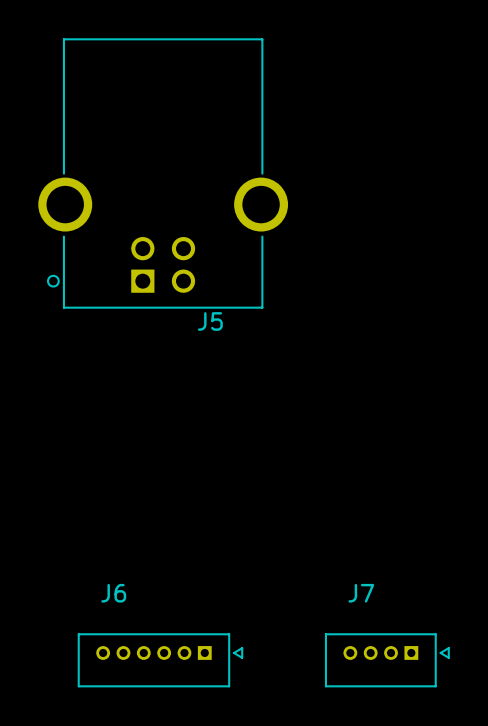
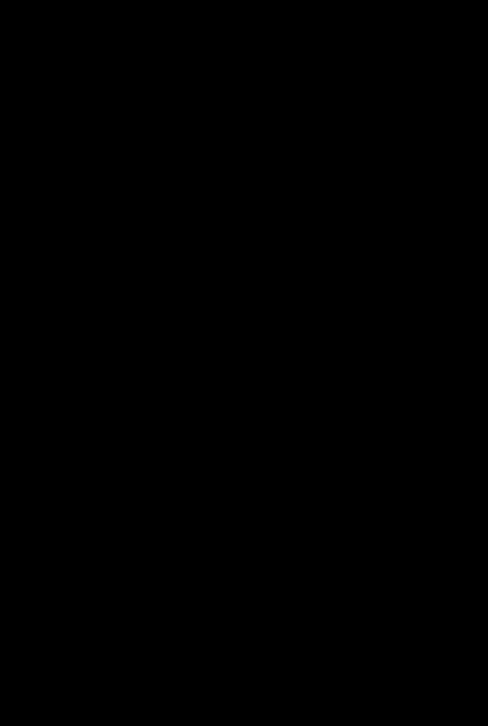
J5: (163, 173) -> none
J6: (160, 660) -> none
J7: (387, 660) -> none

